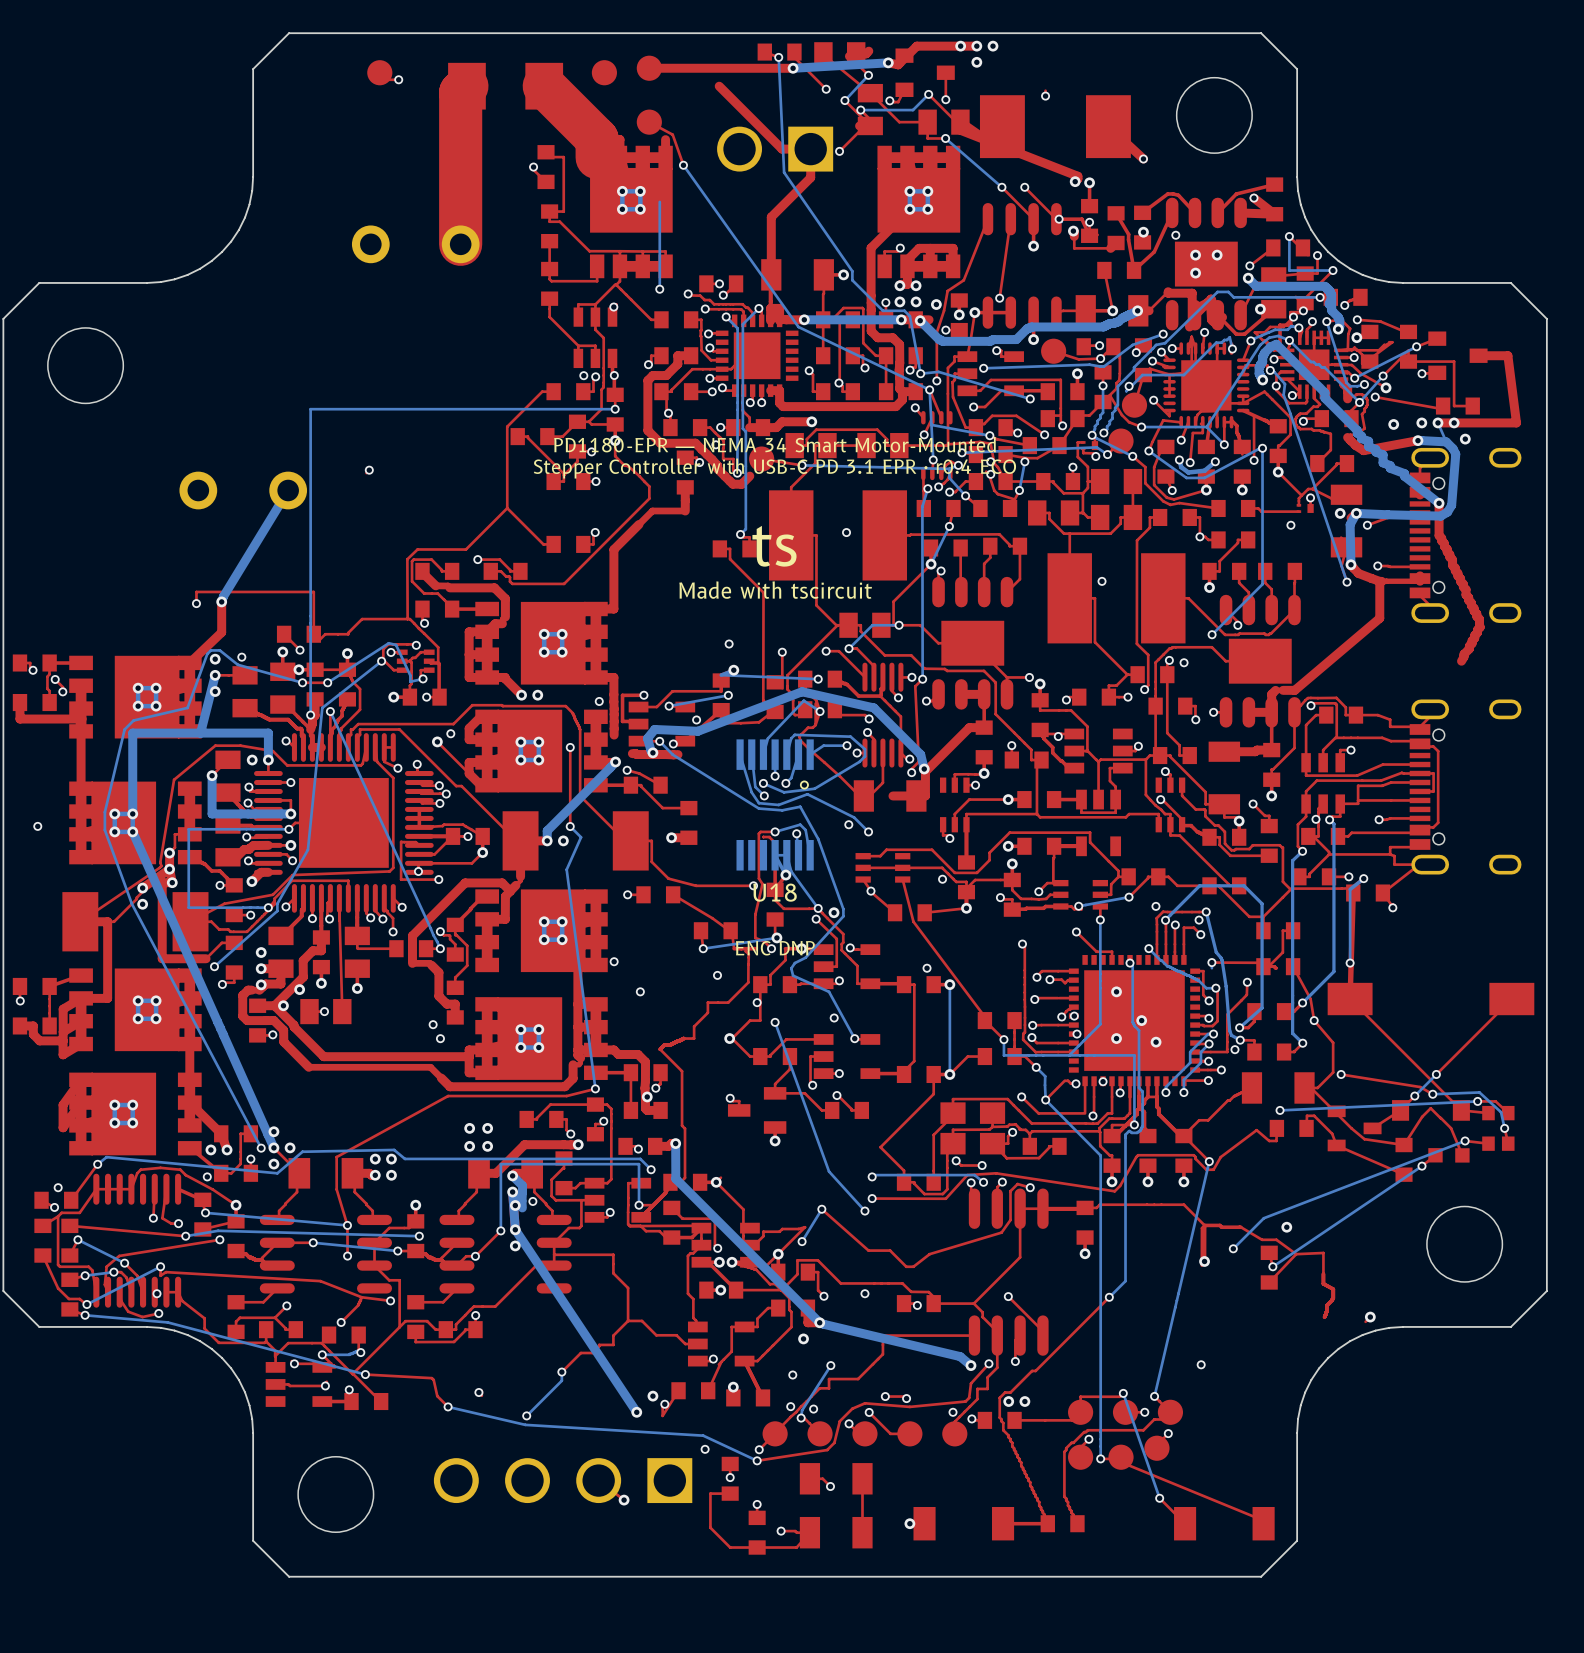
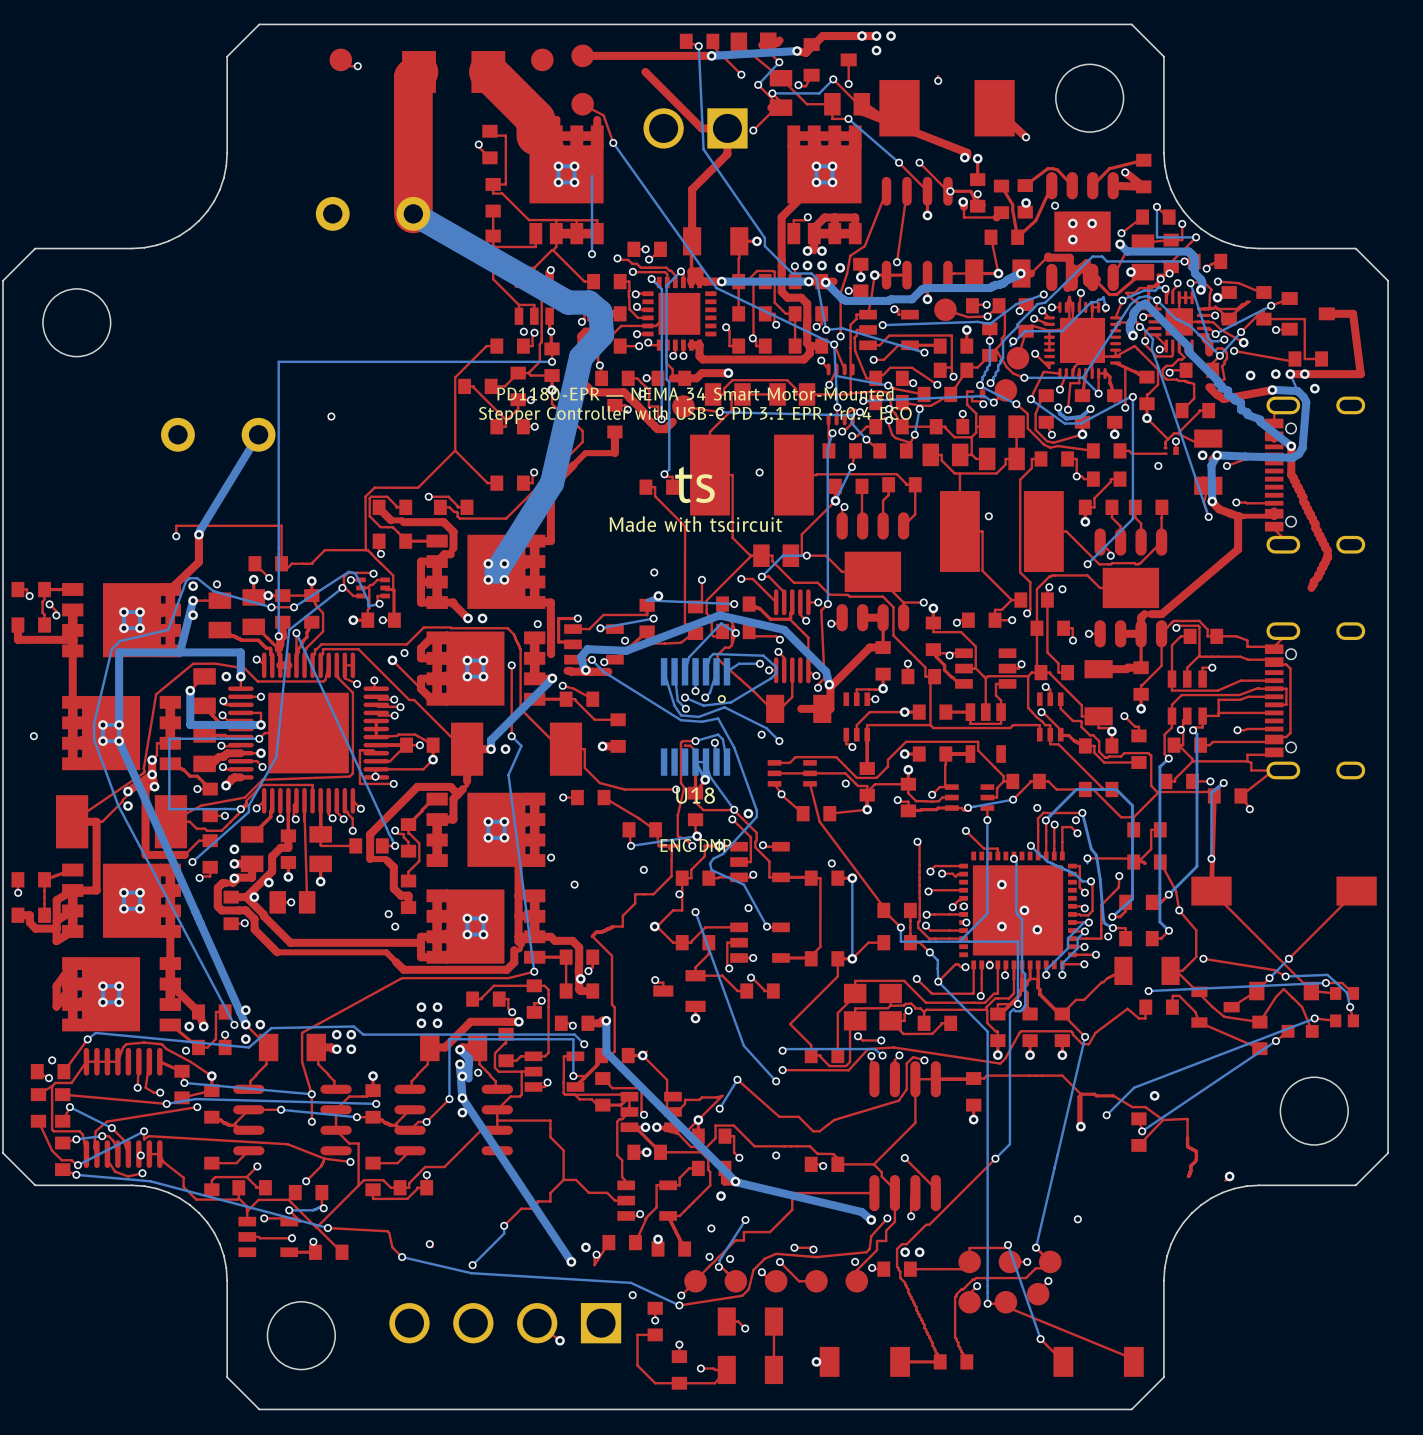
bottom track: none -> (413, 213) (568, 302) (589, 302) (600, 312) (602, 334) (581, 357) (552, 483) (496, 571)

